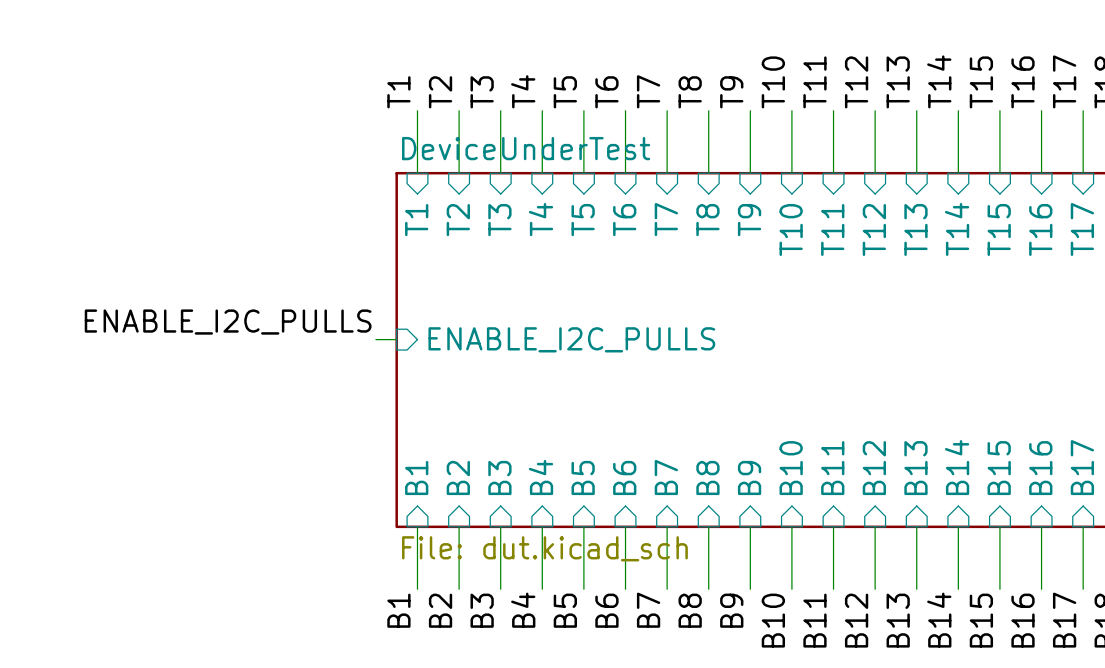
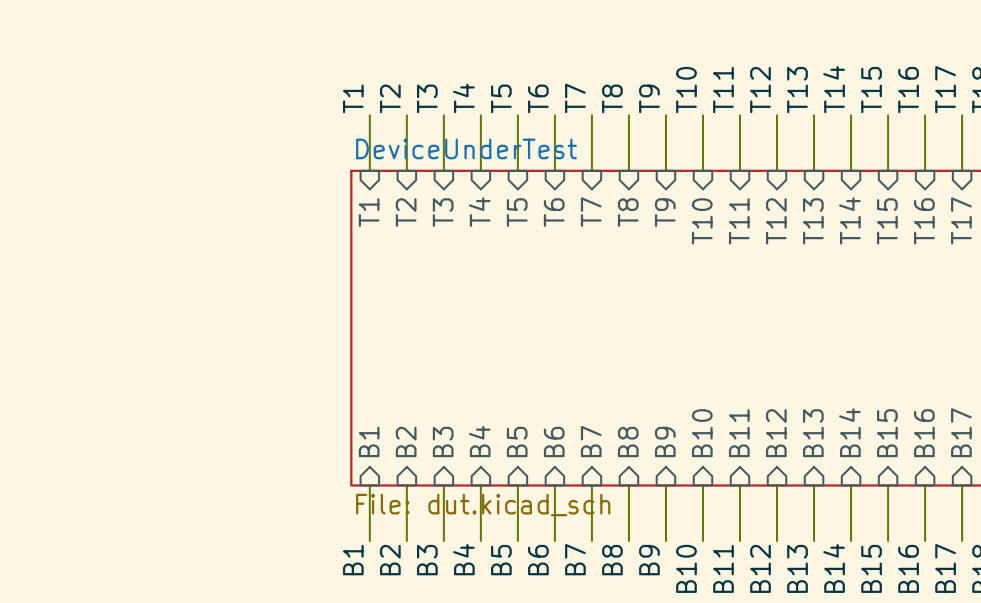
label: ENABLE_I2C_PULLS (228, 322) -> none
wire: (375, 339) (396, 339) -> none
sheet pin: ENABLE_I2C_PULLS (571, 339) -> none

